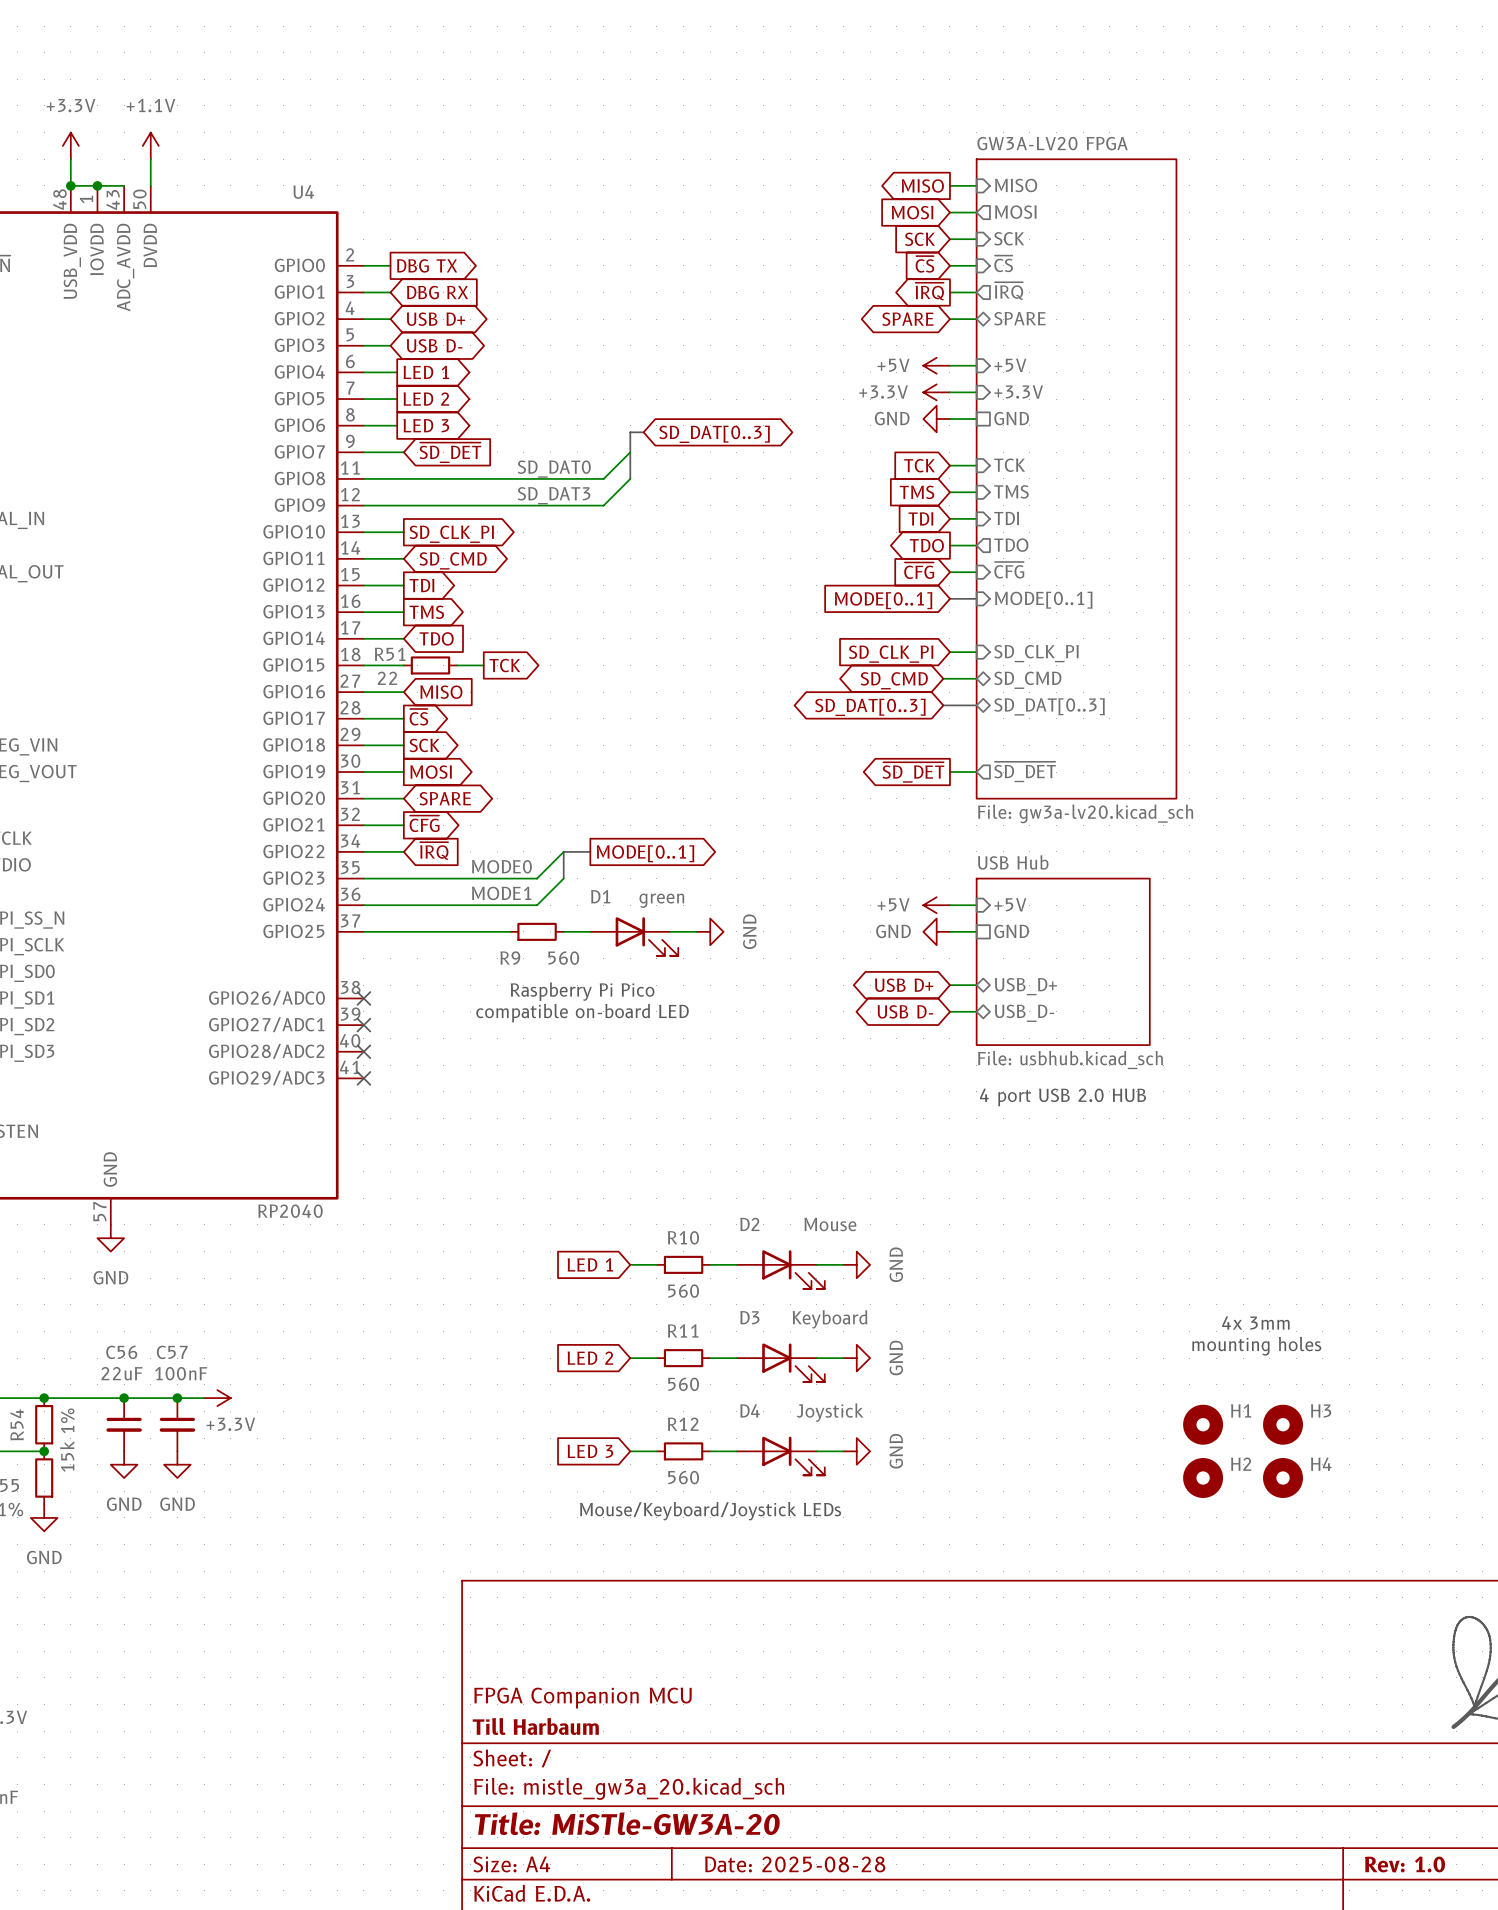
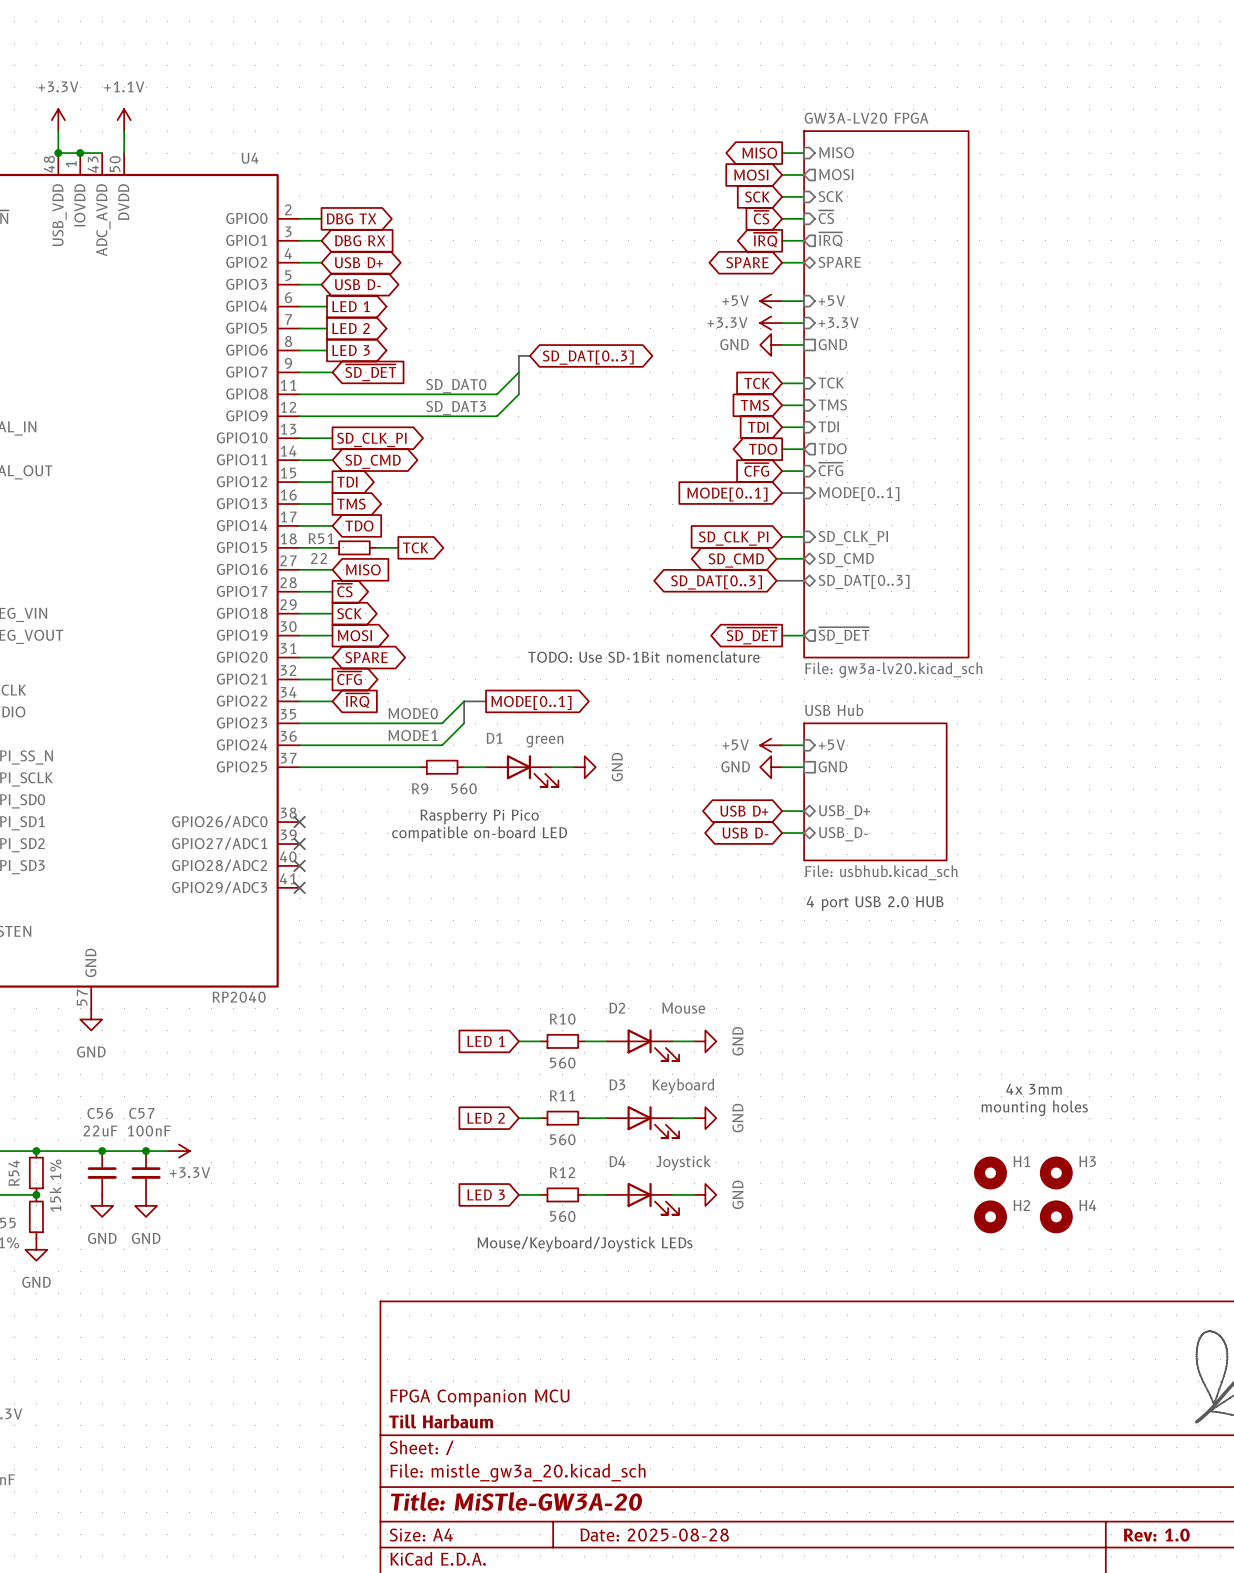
text: none -> TODO: Use SD-1Bit nomenclature (643, 656)

